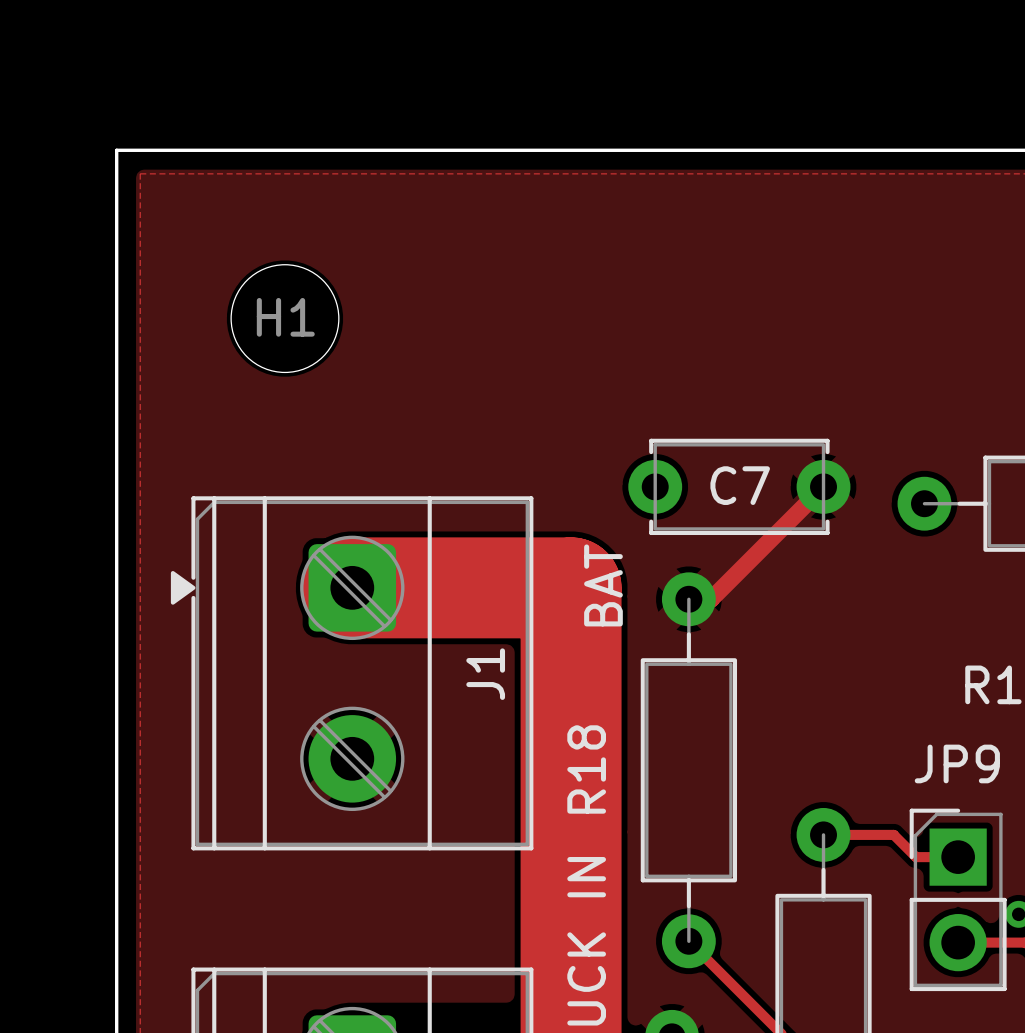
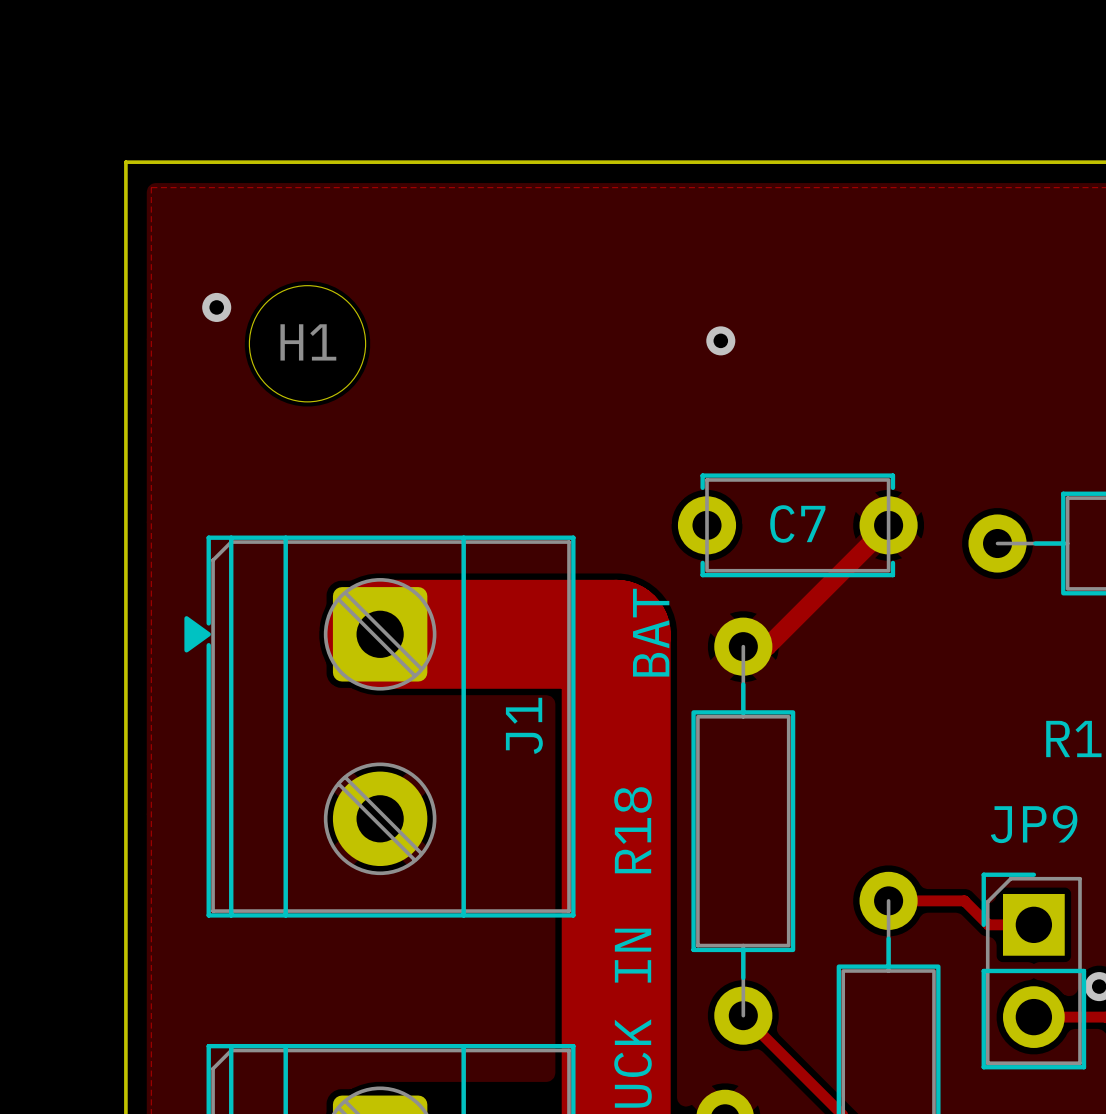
via: none -> (216, 307)
via: none -> (720, 340)

